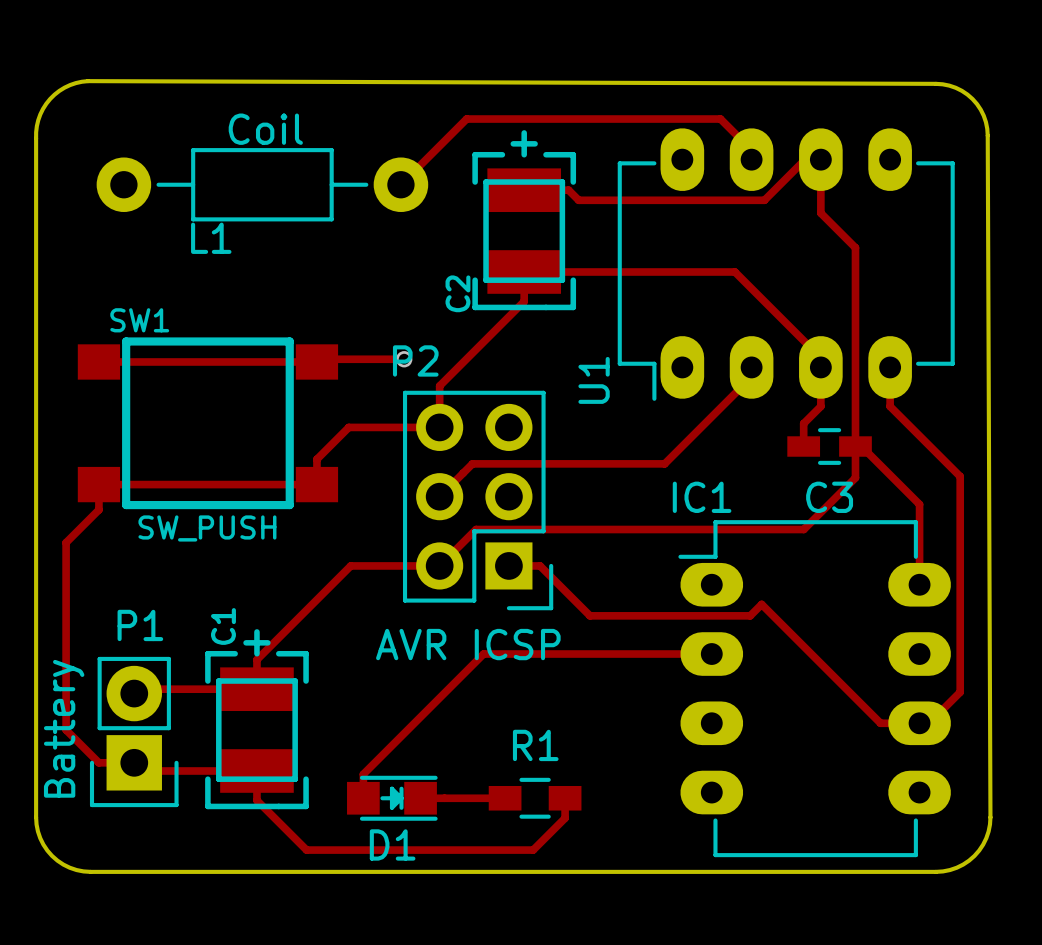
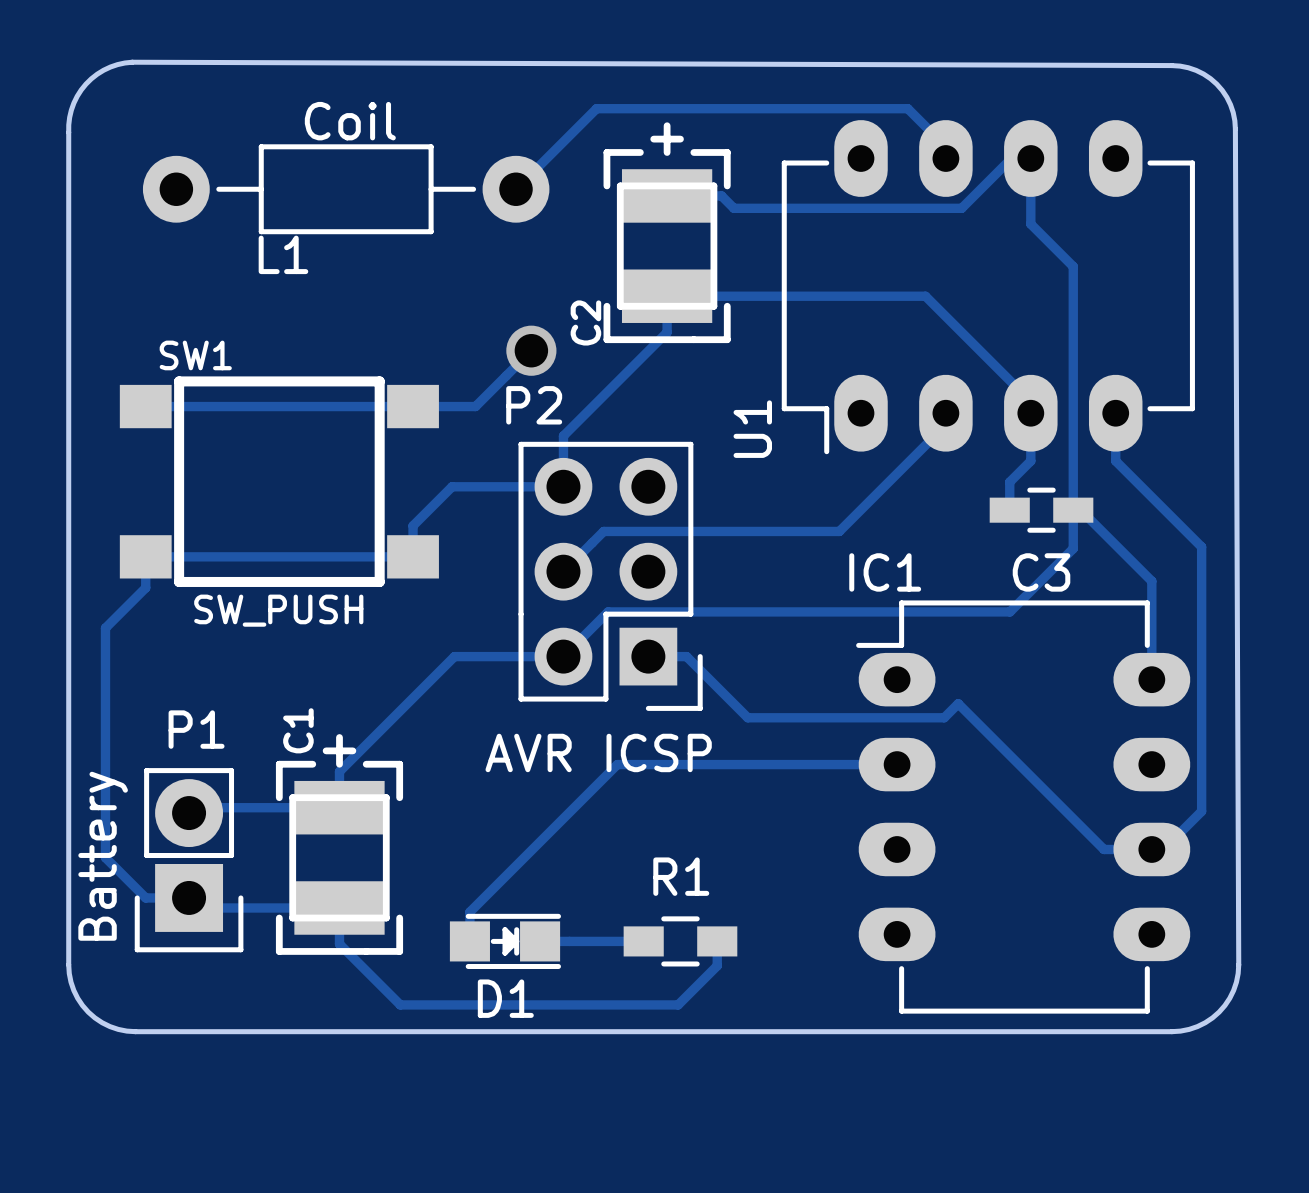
via: none -> (531, 350)
track: (404, 359) (319, 359) (316, 361) -> (531, 350) (475, 406) (413, 406)
via: (404, 359) -> none

